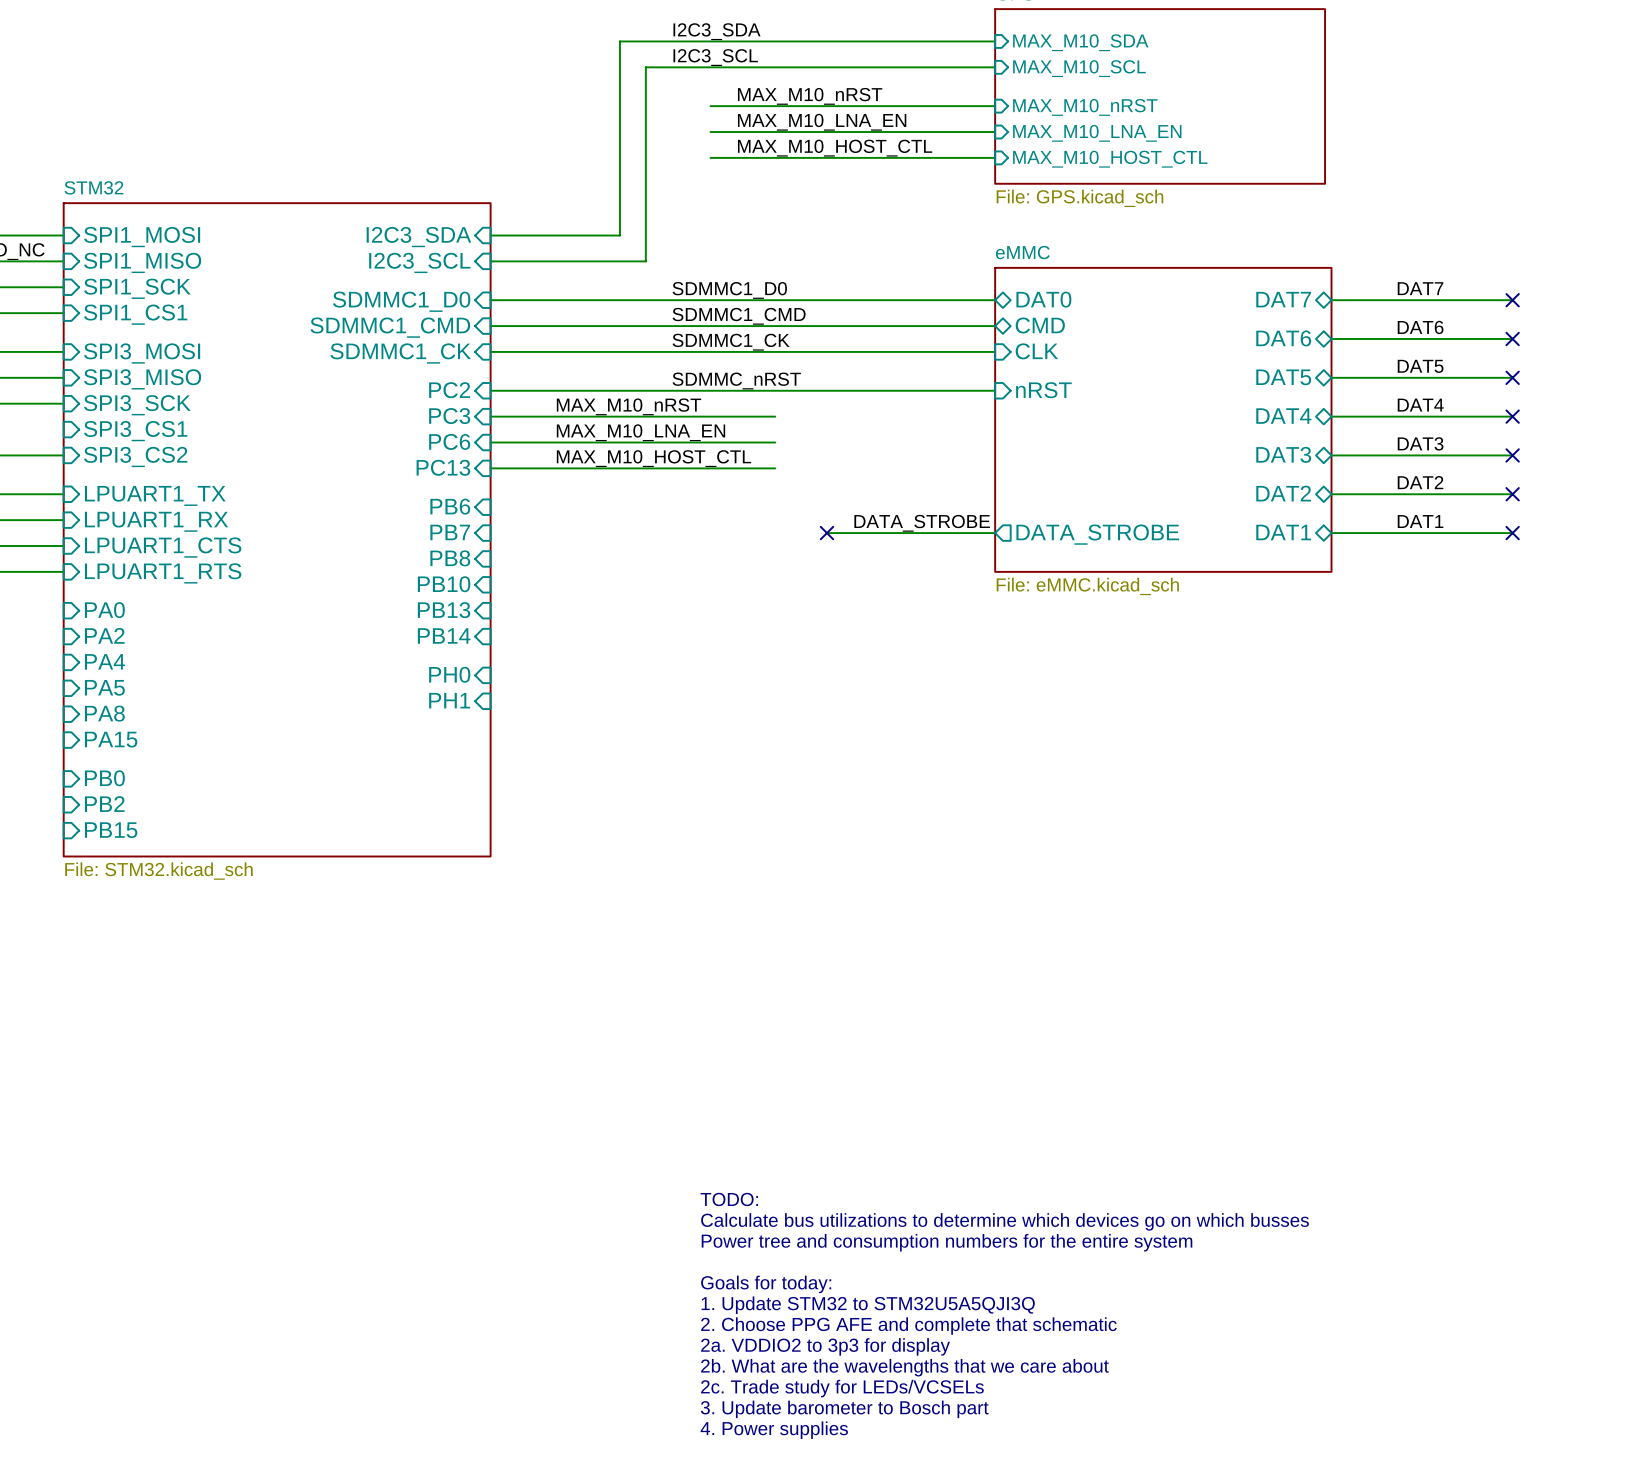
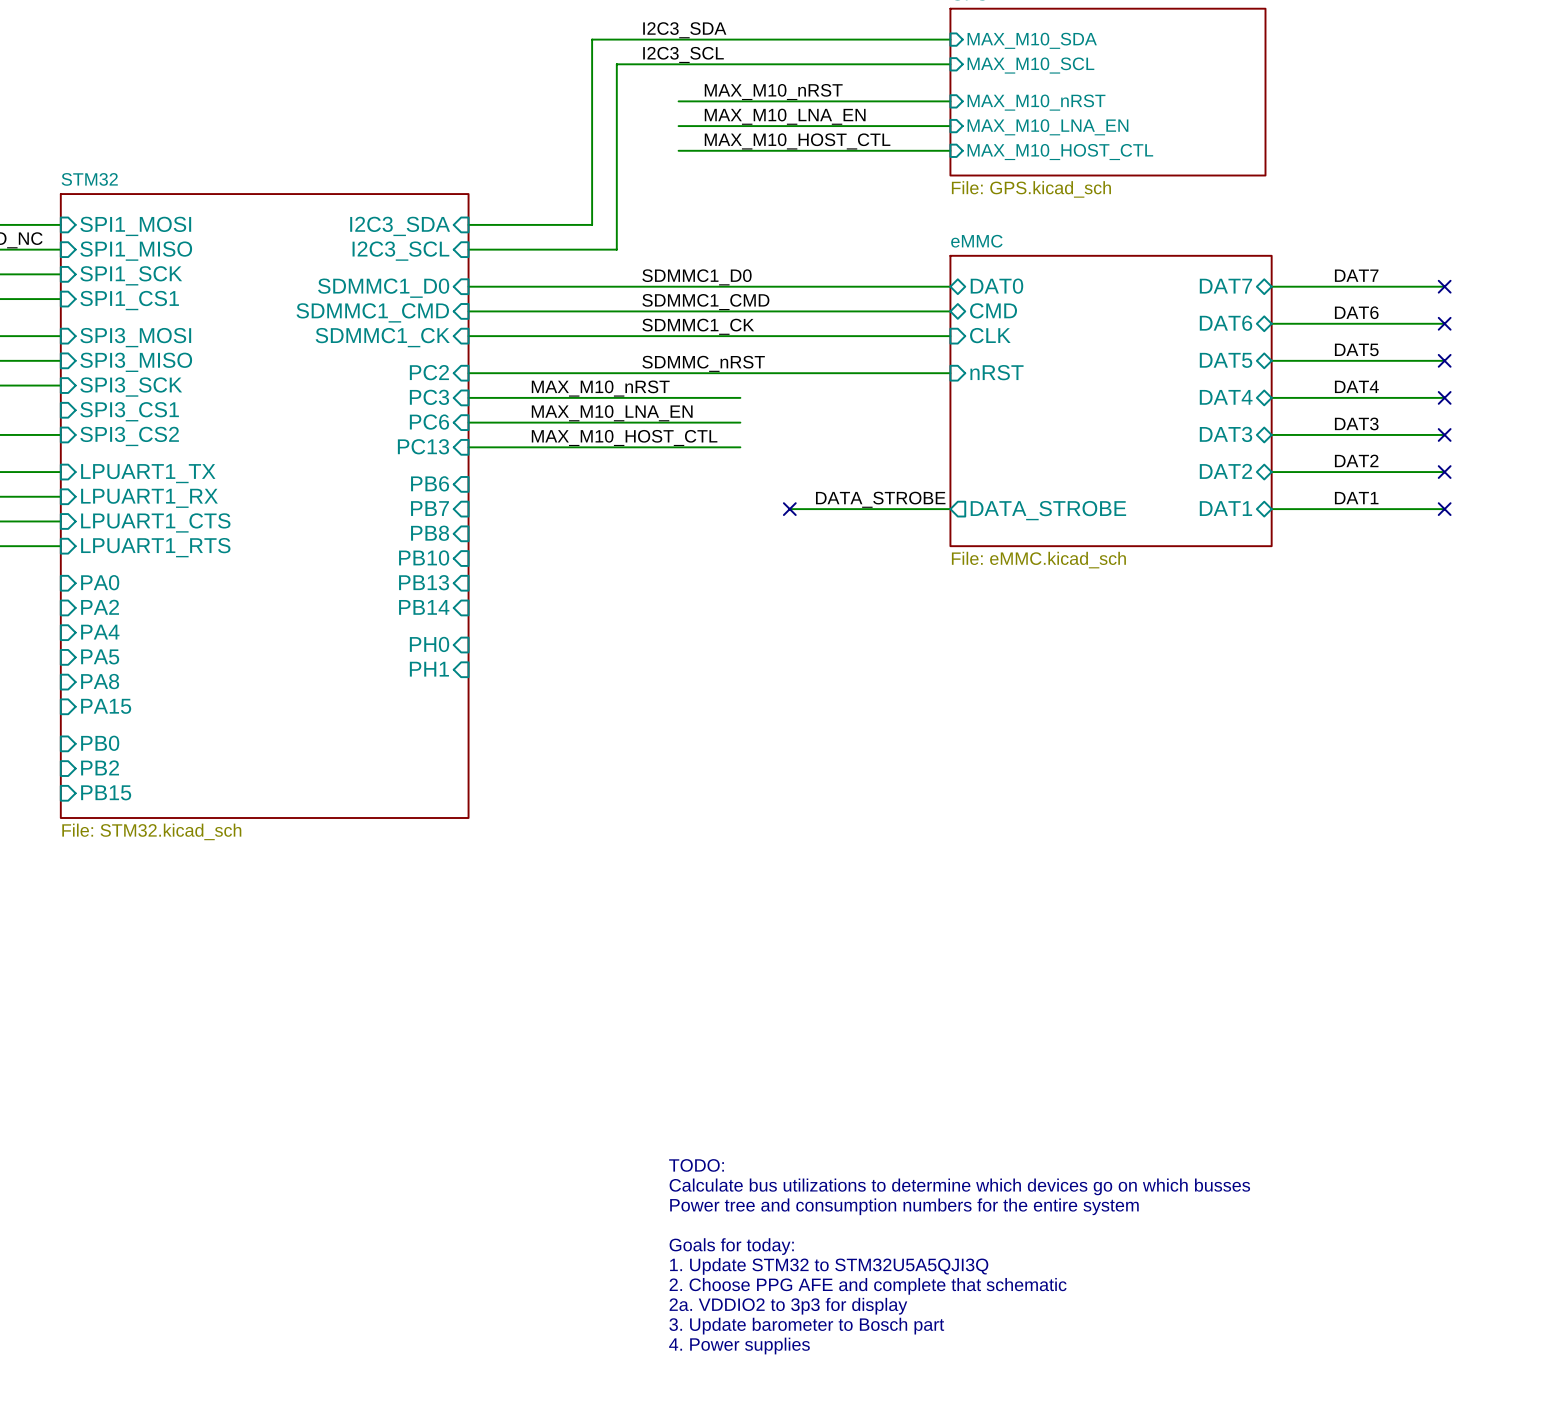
text: TODO: (729, 1199) -> none
text: Calculate bus utilizations to determine which devices go on which busses (1005, 1221) -> TODO: (696, 1165)
text: Power tree and consumption numbers for the entire system (947, 1242) -> Calculate bus utilizations to determine which devices go on which busses (959, 1186)
text: none -> Power tree and consumption numbers for the entire system (904, 1206)
text: Goals for today: (766, 1284) -> none
text: 1. Update STM32 to STM32U5A5QJI3Q (868, 1305) -> Goals for today: (731, 1246)
text: 2. Choose PPG AFE and complete that schematic (908, 1326) -> 1. Update STM32 to STM32U5A5QJI3Q (829, 1266)
text: 2a. VDDIO2 to 3p3 for display (825, 1346) -> 2. Choose PPG AFE and complete that schematic (868, 1286)
text: 2b. What are the wavelengths that we care about (904, 1367) -> 2a. VDDIO2 to 3p3 for display (788, 1306)
text: 2c. Trade study for LEDs/VCSELs (842, 1388) -> 3. Update barometer to Bosch part (806, 1326)
text: 3. Update barometer to Bosch part (844, 1409) -> 4. Power supplies (739, 1346)
text: 4. Power supplies (774, 1430) -> none

